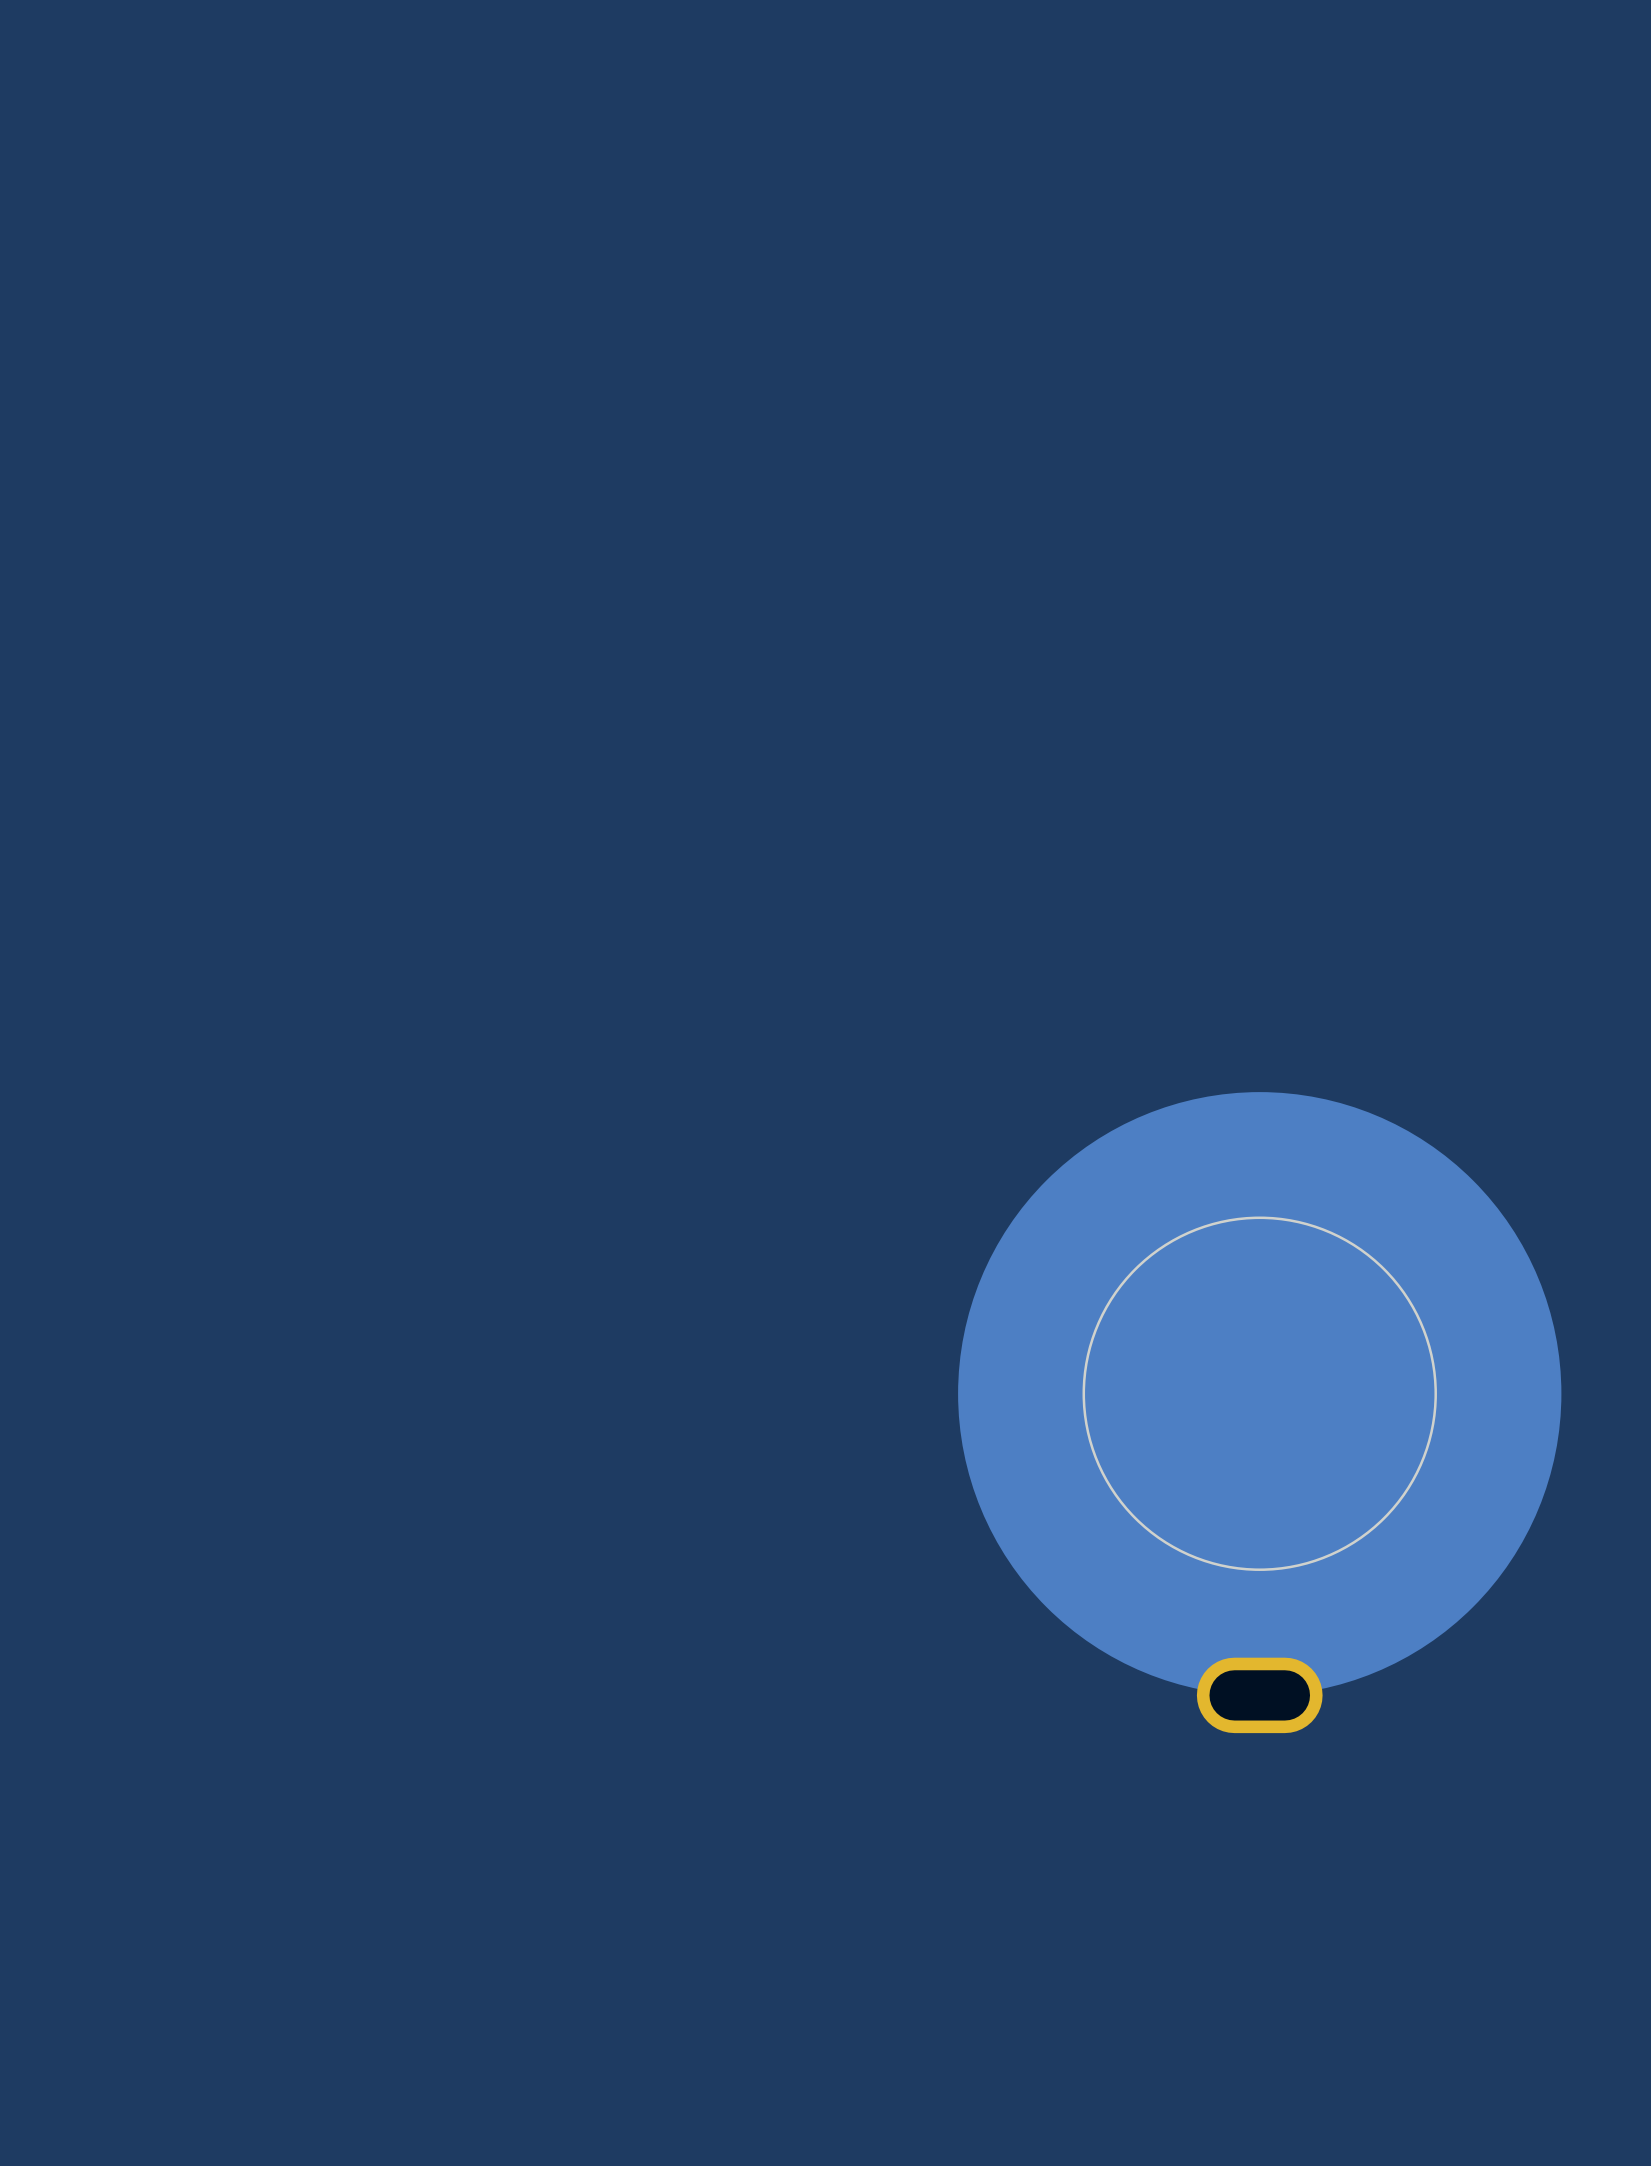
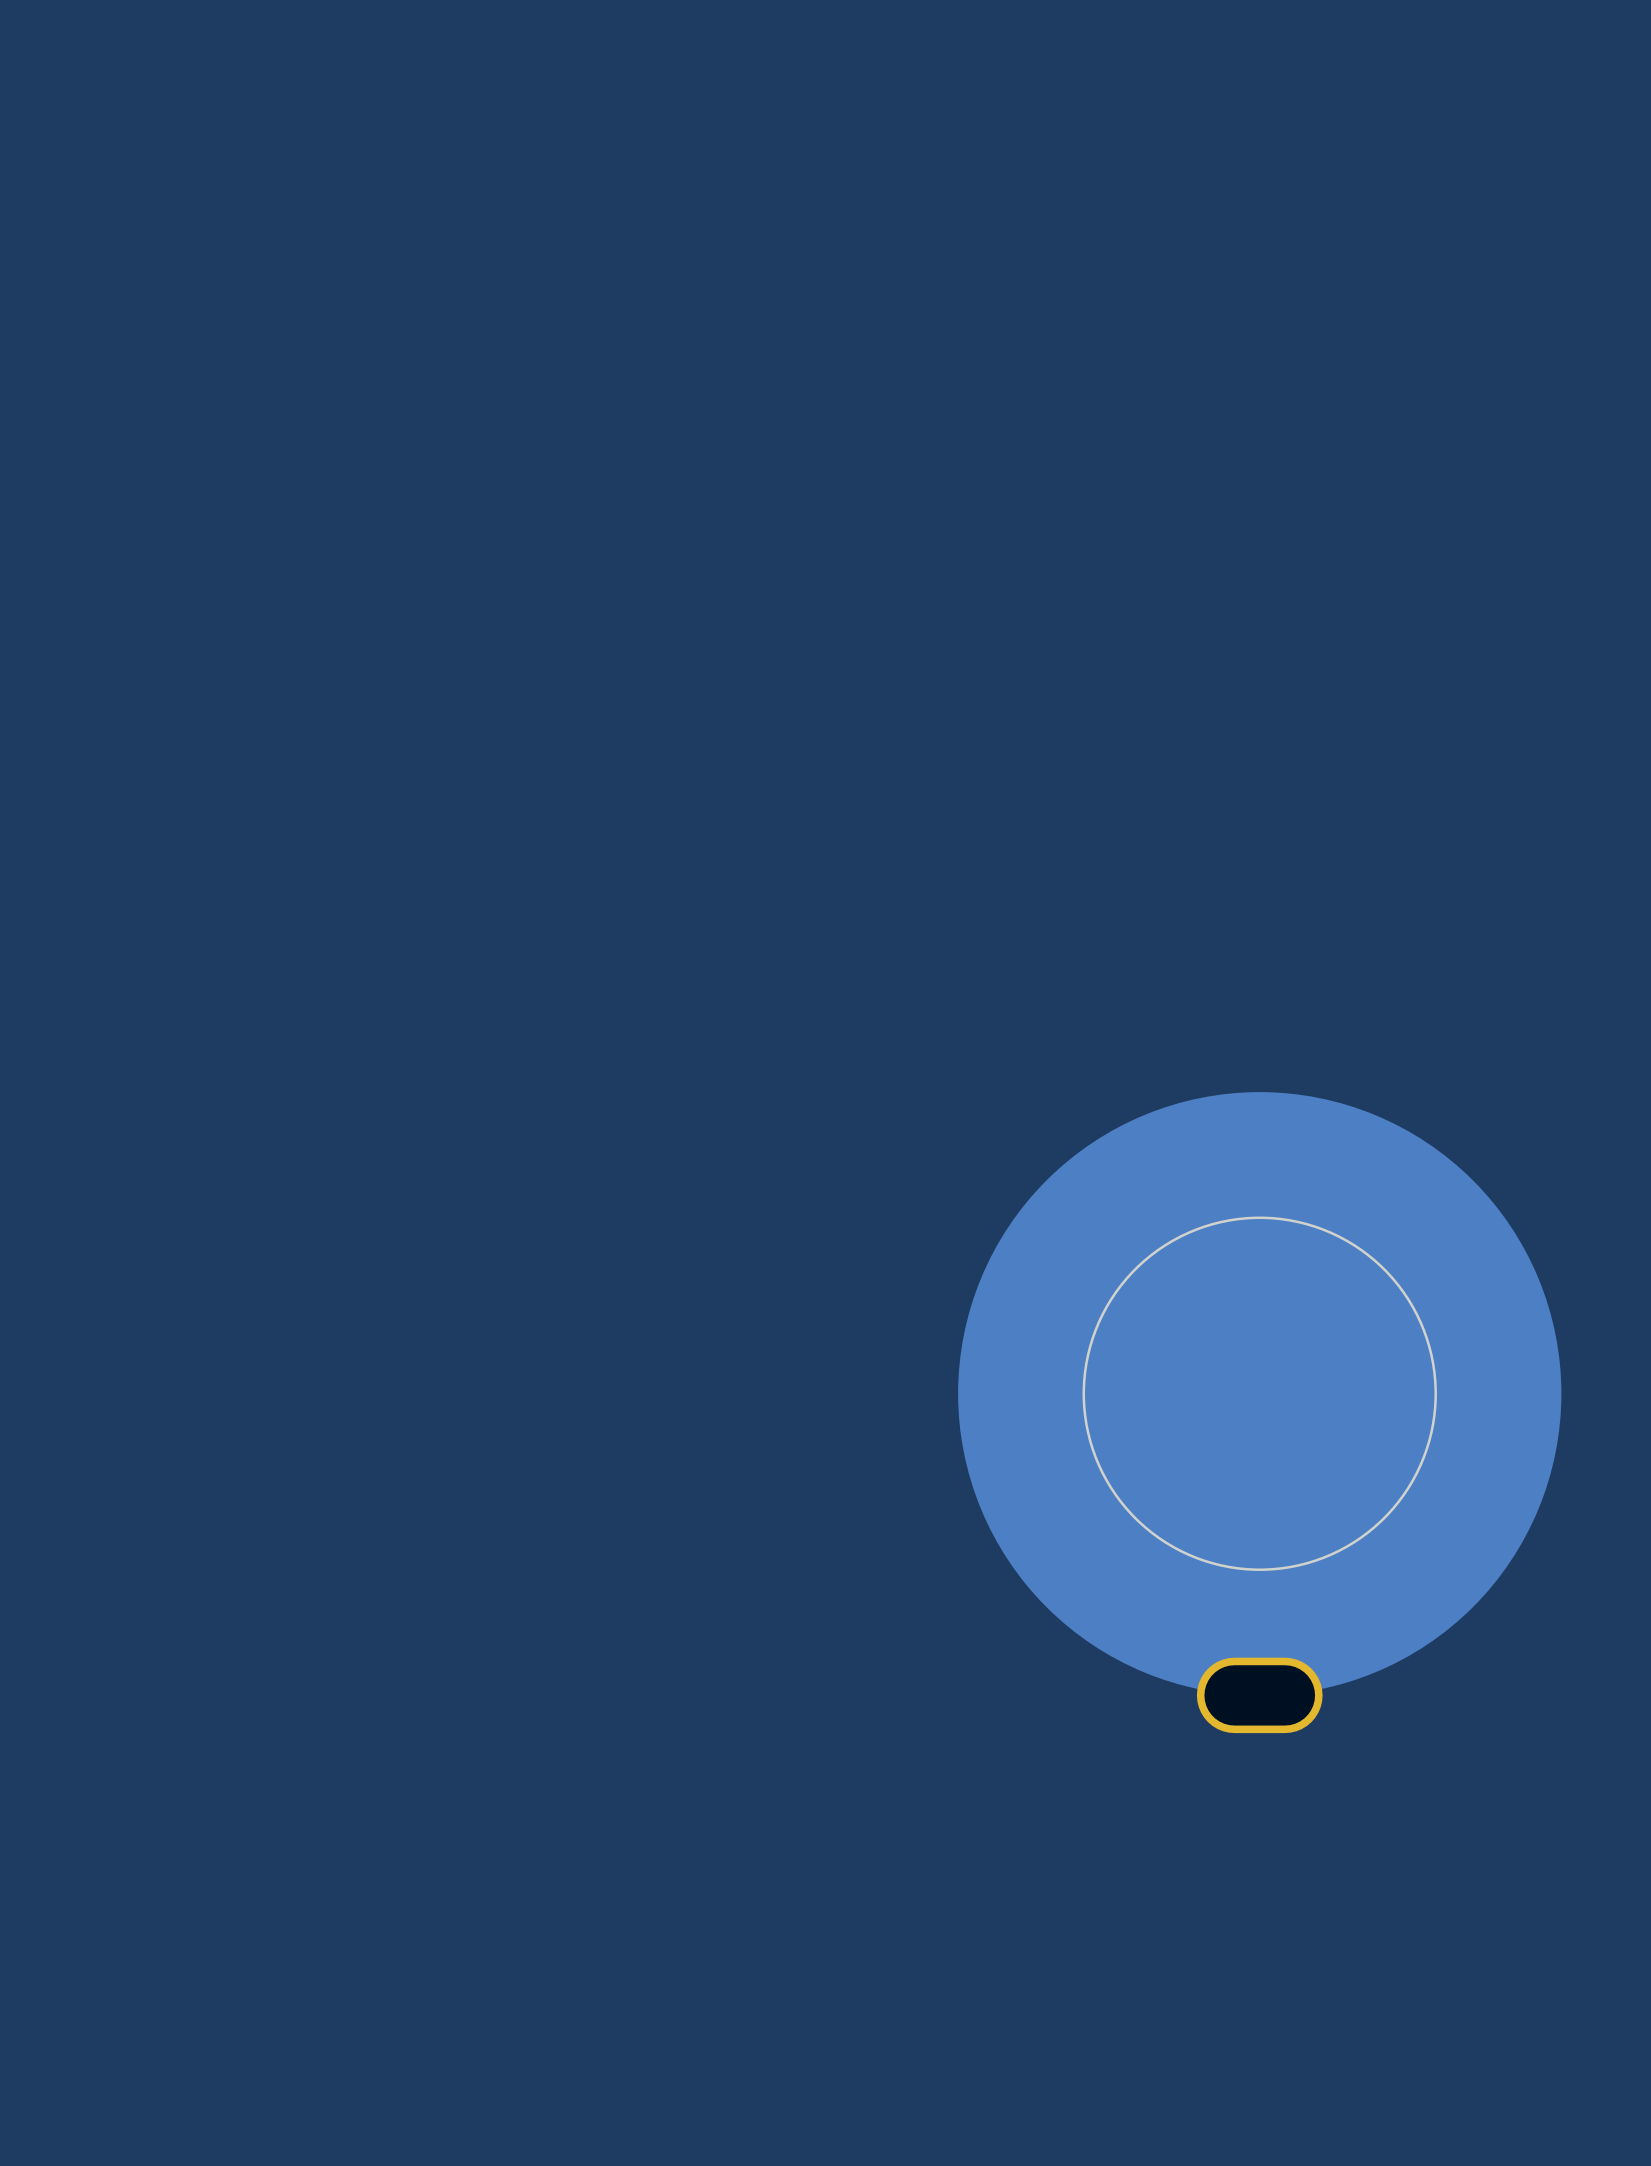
part footprint: [958, 1092, 1562, 1734] -> [958, 1092, 1562, 1734]

